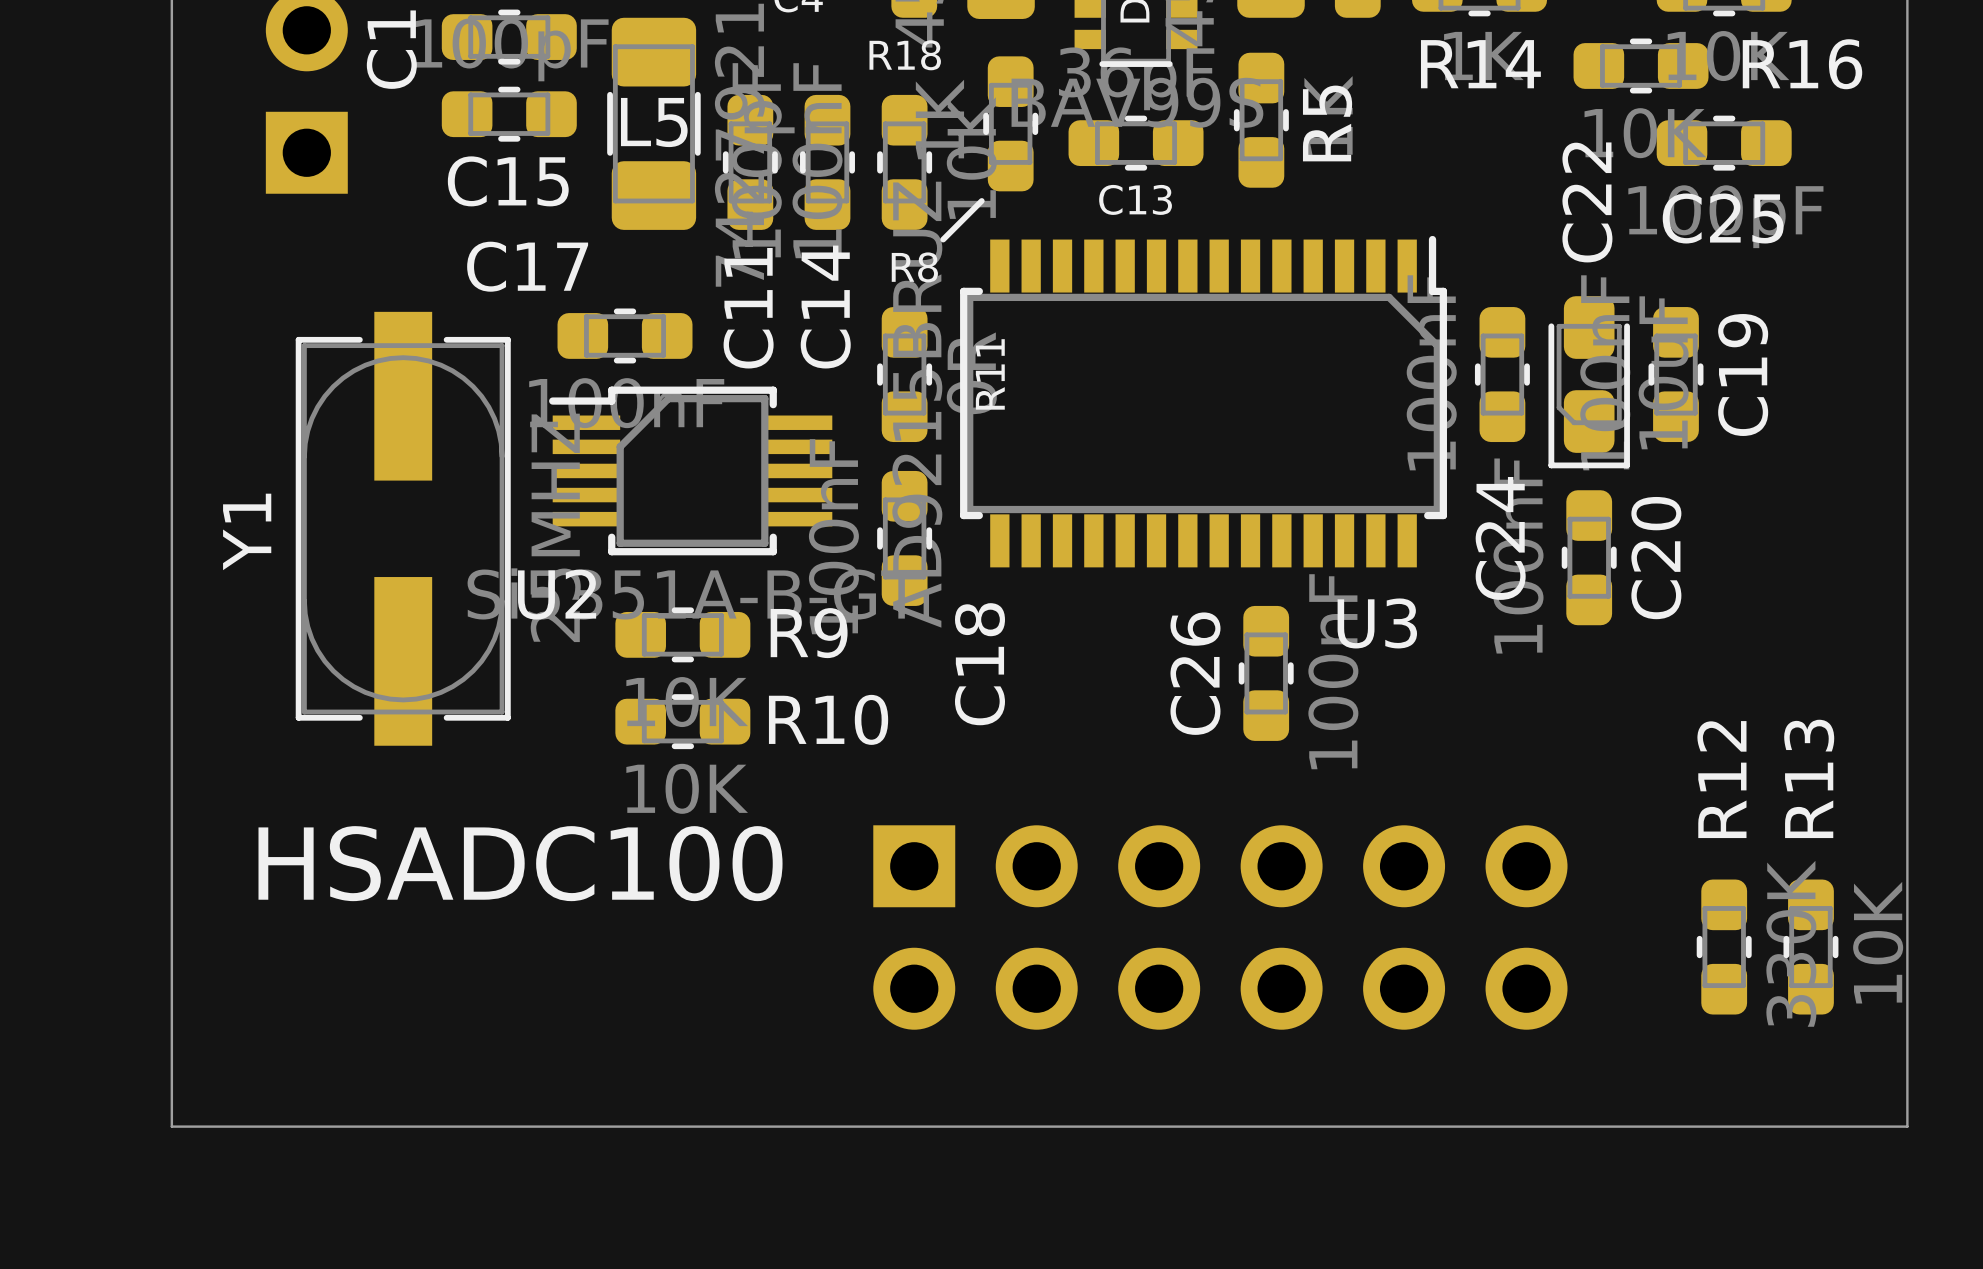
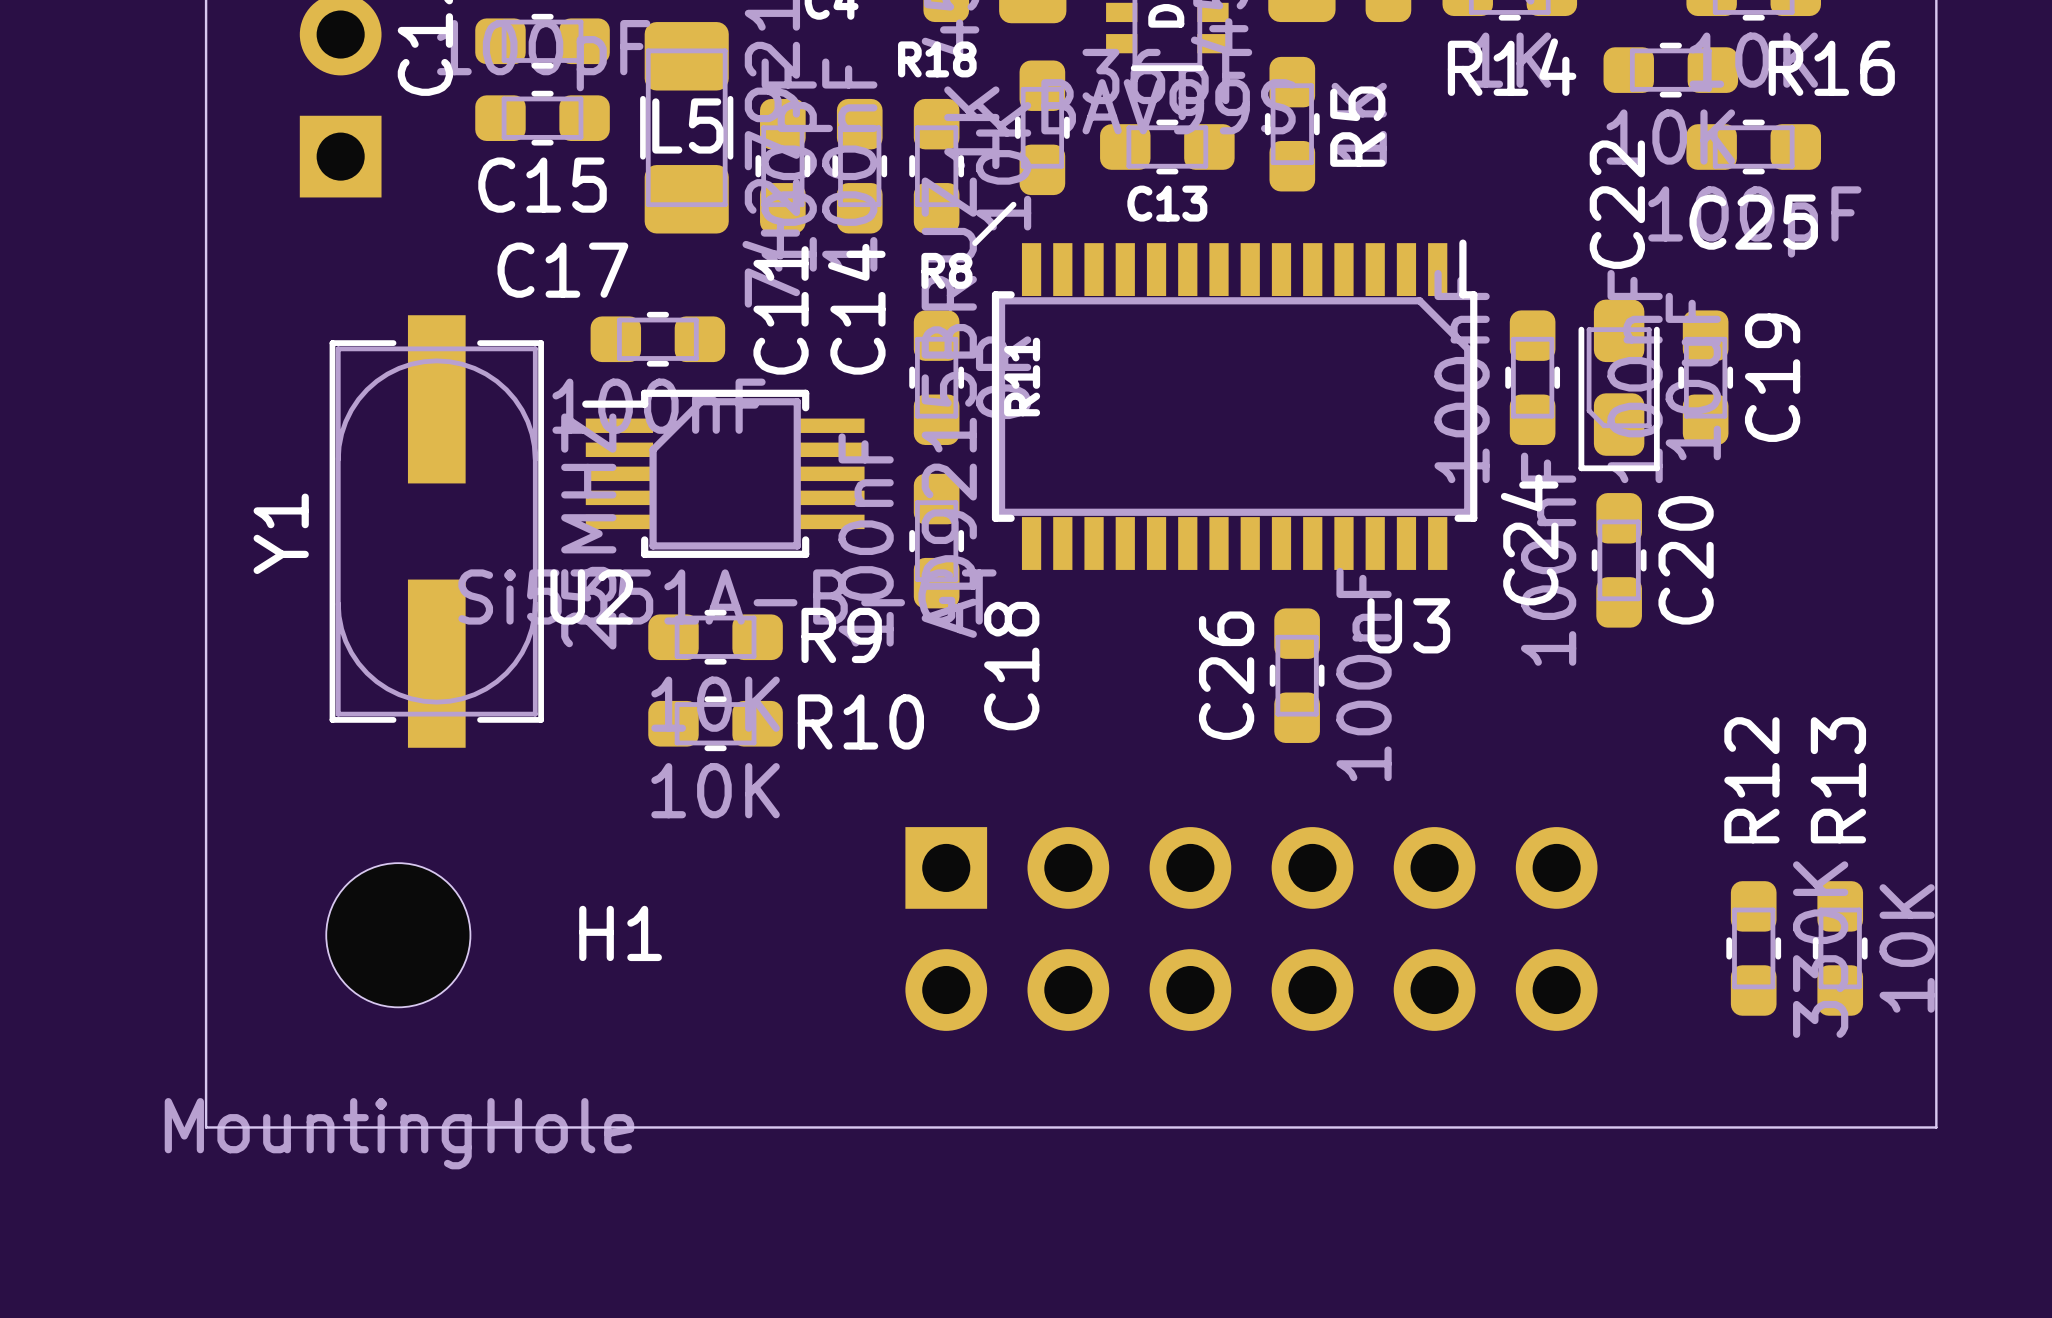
text: HSADC100 (520, 863) -> none
H1: none -> MountingHole (398, 935)

